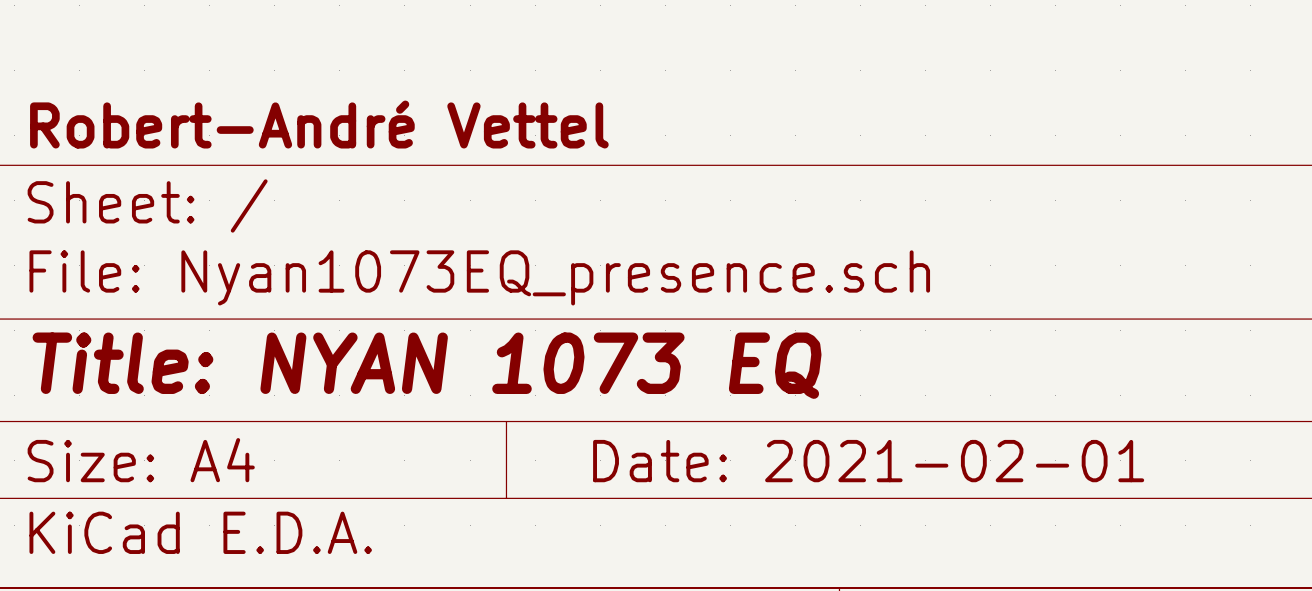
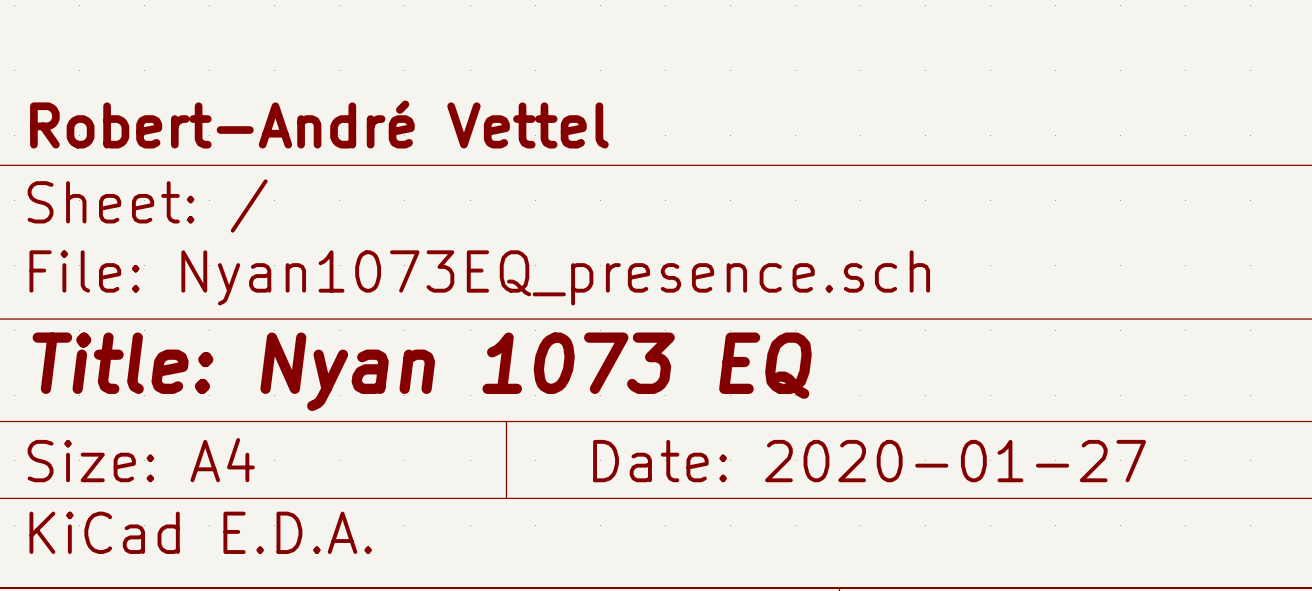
title block: Title: NYAN 1073 EQ (427, 365) -> Title: Nyan 1073 EQ (422, 371)
title block: Date: 2021-02-01 (868, 461) -> Date: 2020-01-27 (869, 461)

